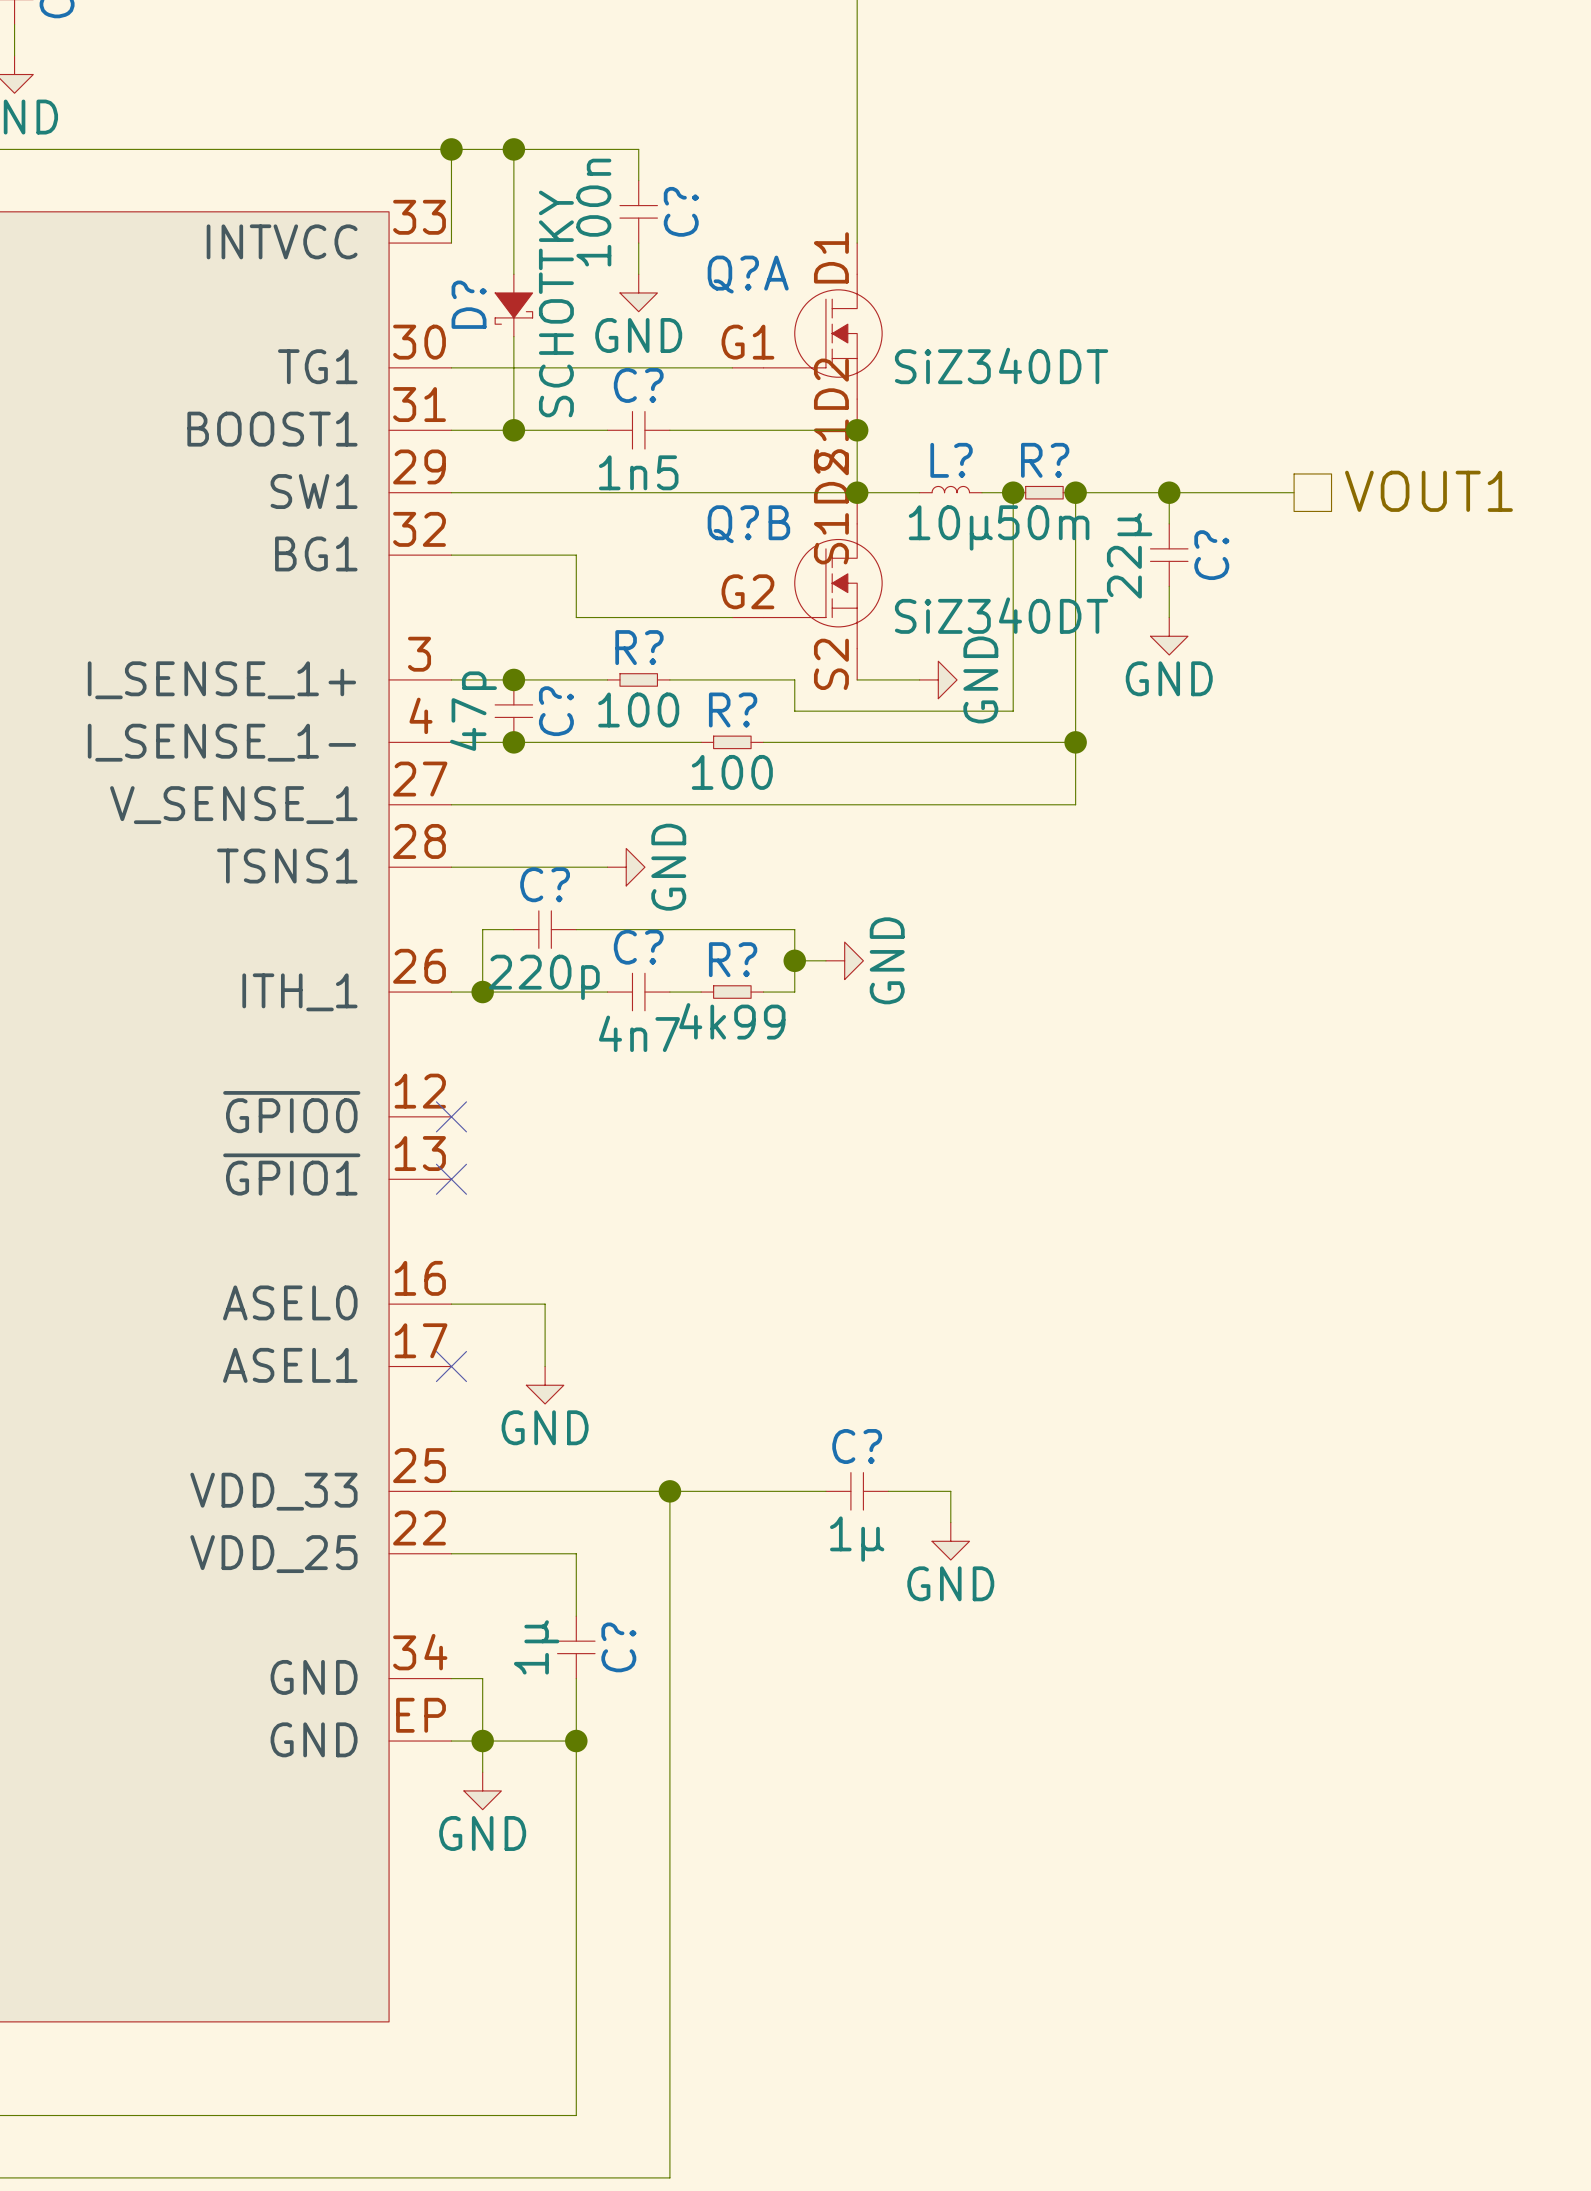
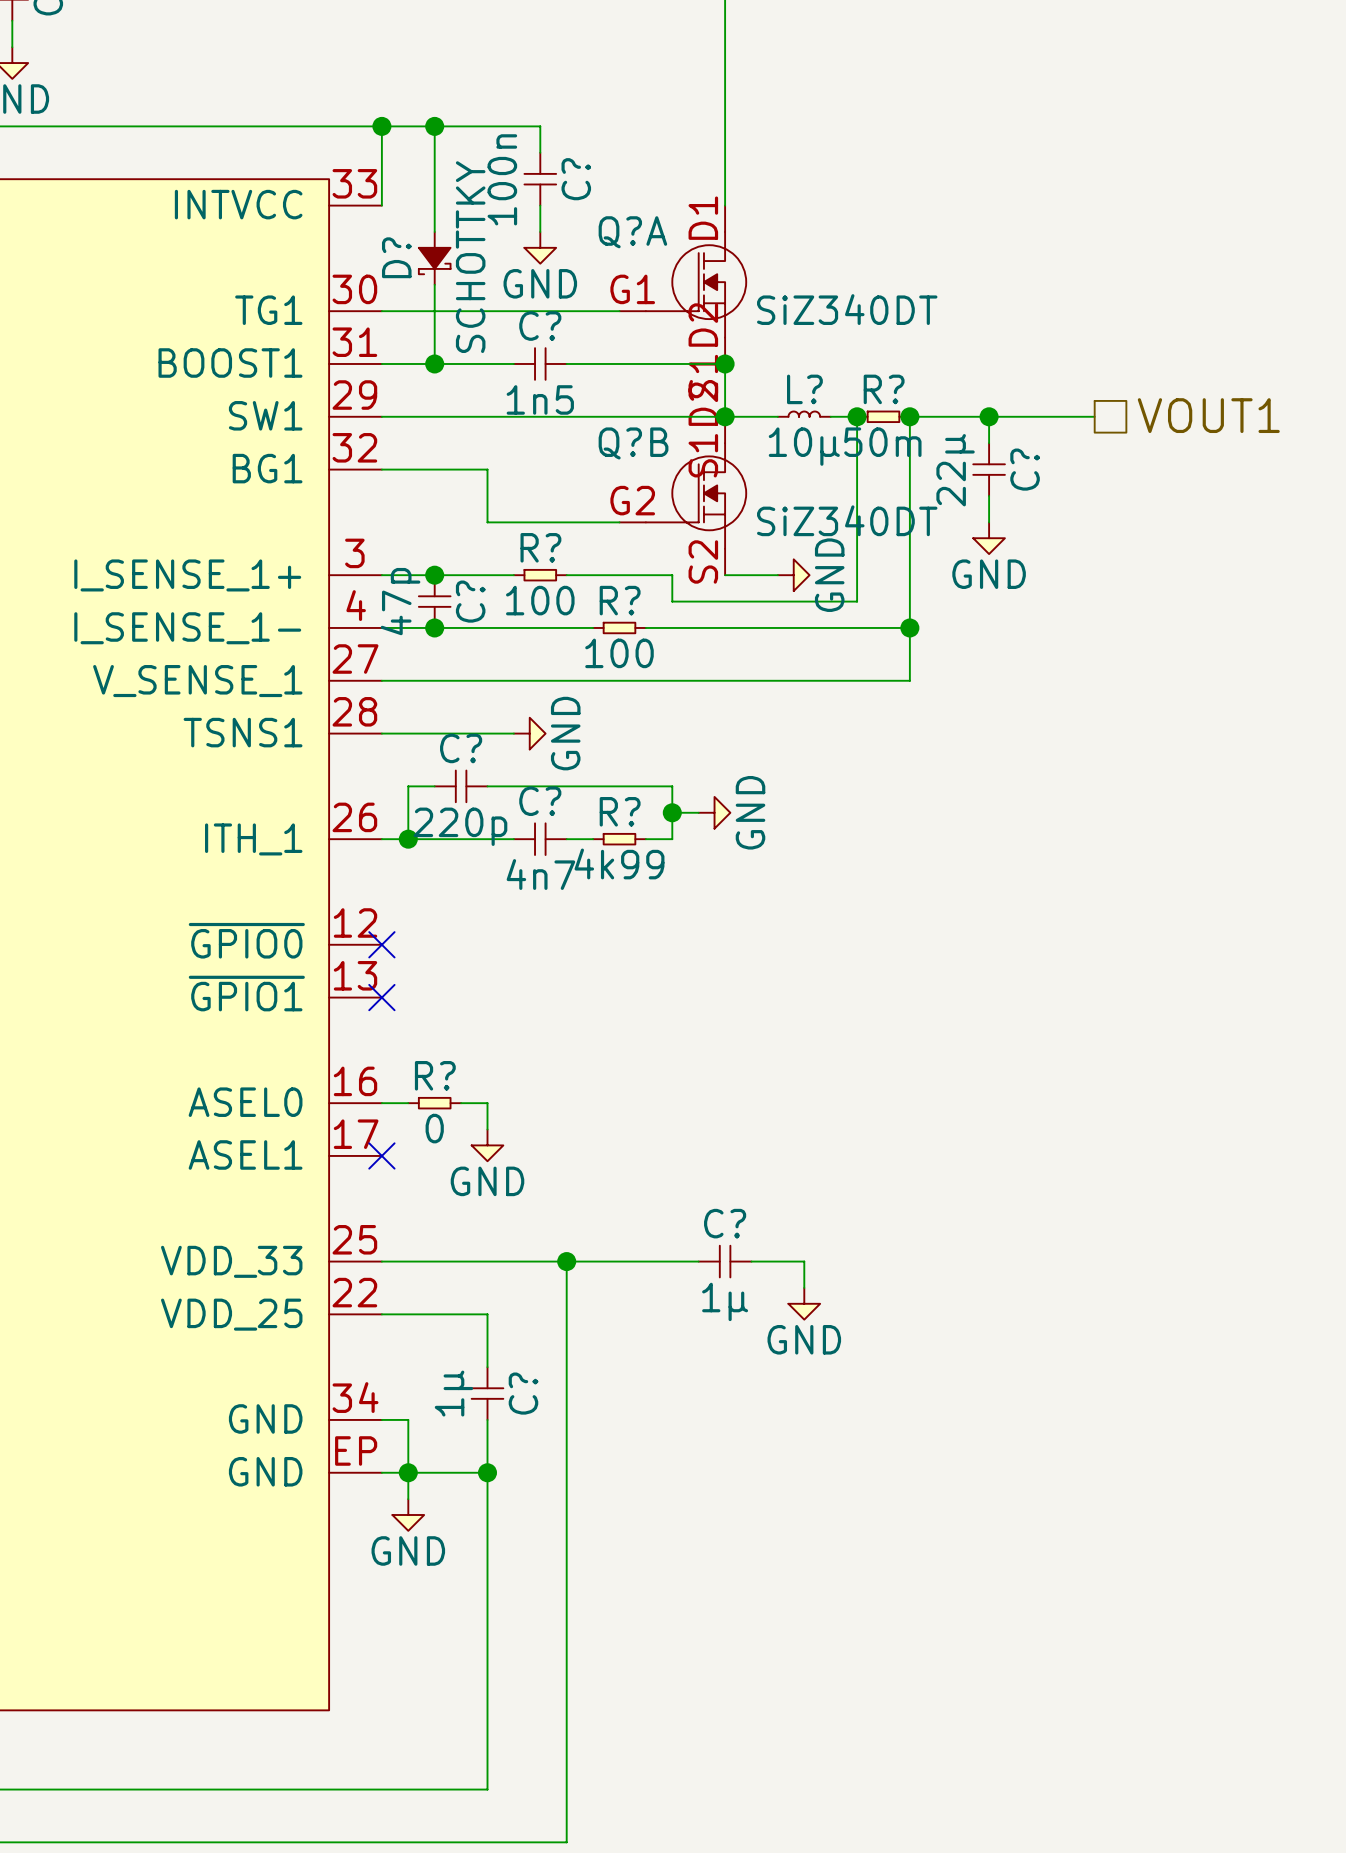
wire: (482, 1304) (545, 1304) (545, 1366) -> none
R?: none -> 0 (434, 1103)
wire: none -> (461, 1103) (487, 1103) (487, 1129)
power symbol position: GND (545, 1385) -> GND (487, 1145)

